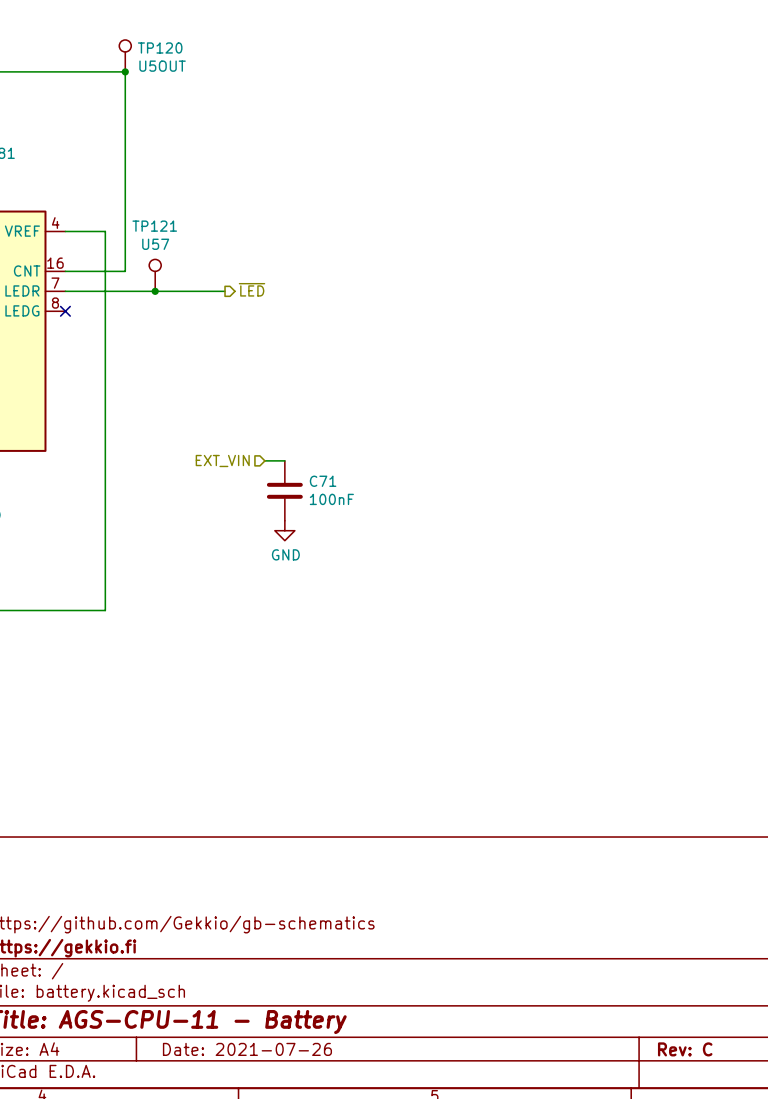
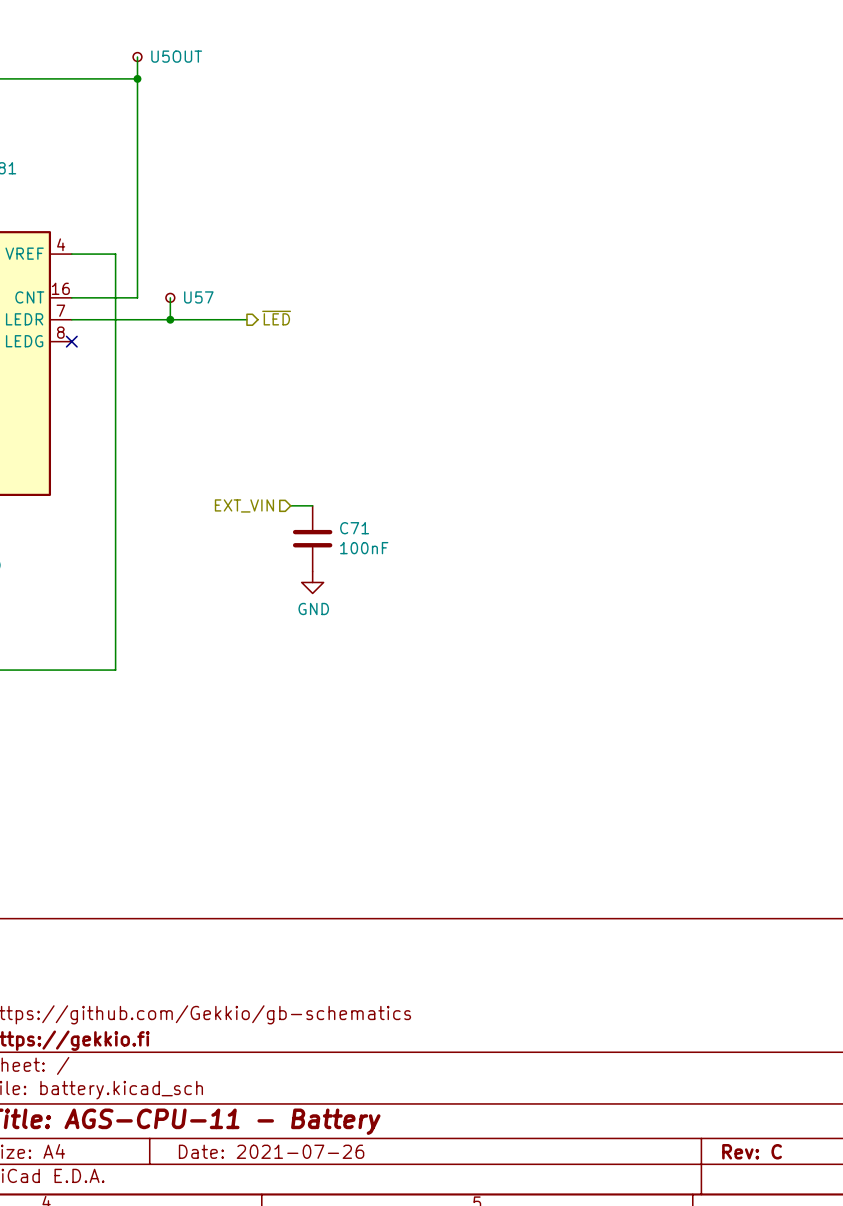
part: none -> U5OUT (137, 57)
TP120: U5OUT (125, 55) -> none
part: none -> U57 (170, 297)
TP121: U57 (155, 275) -> none

